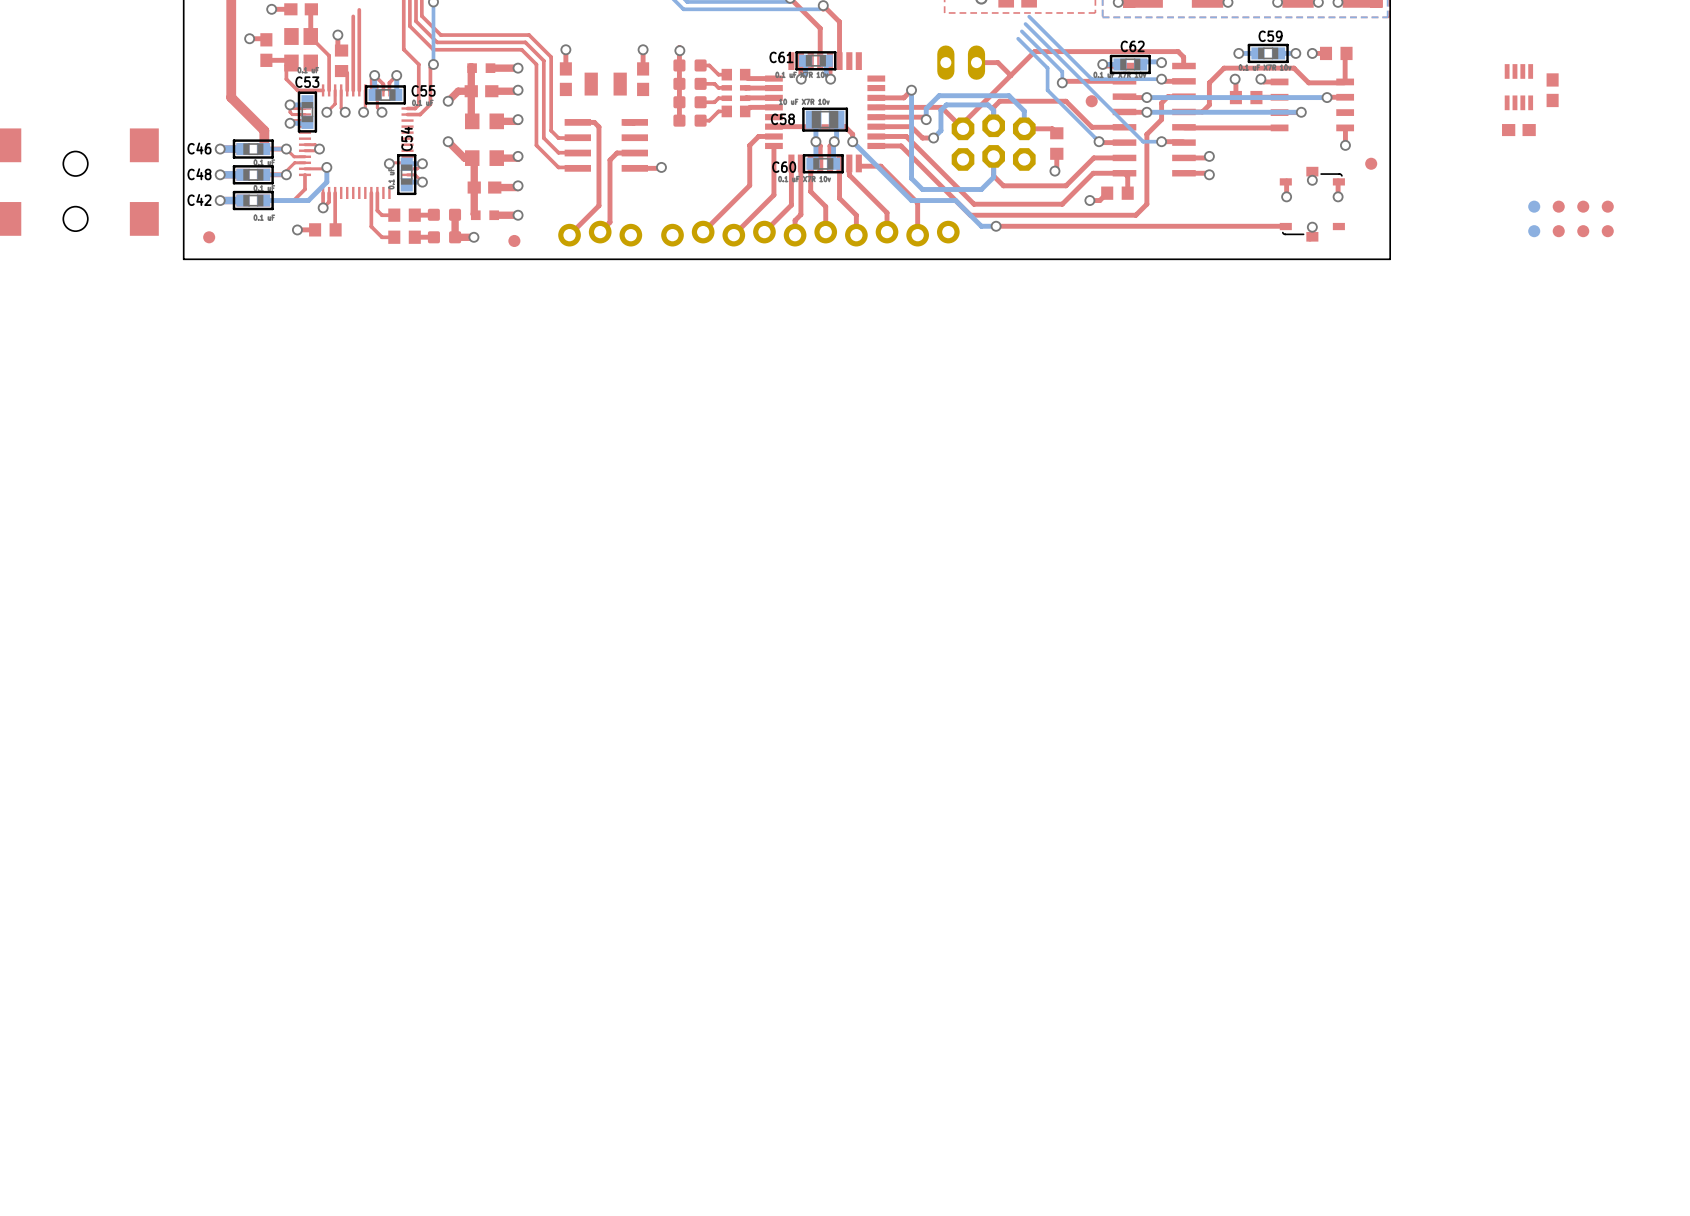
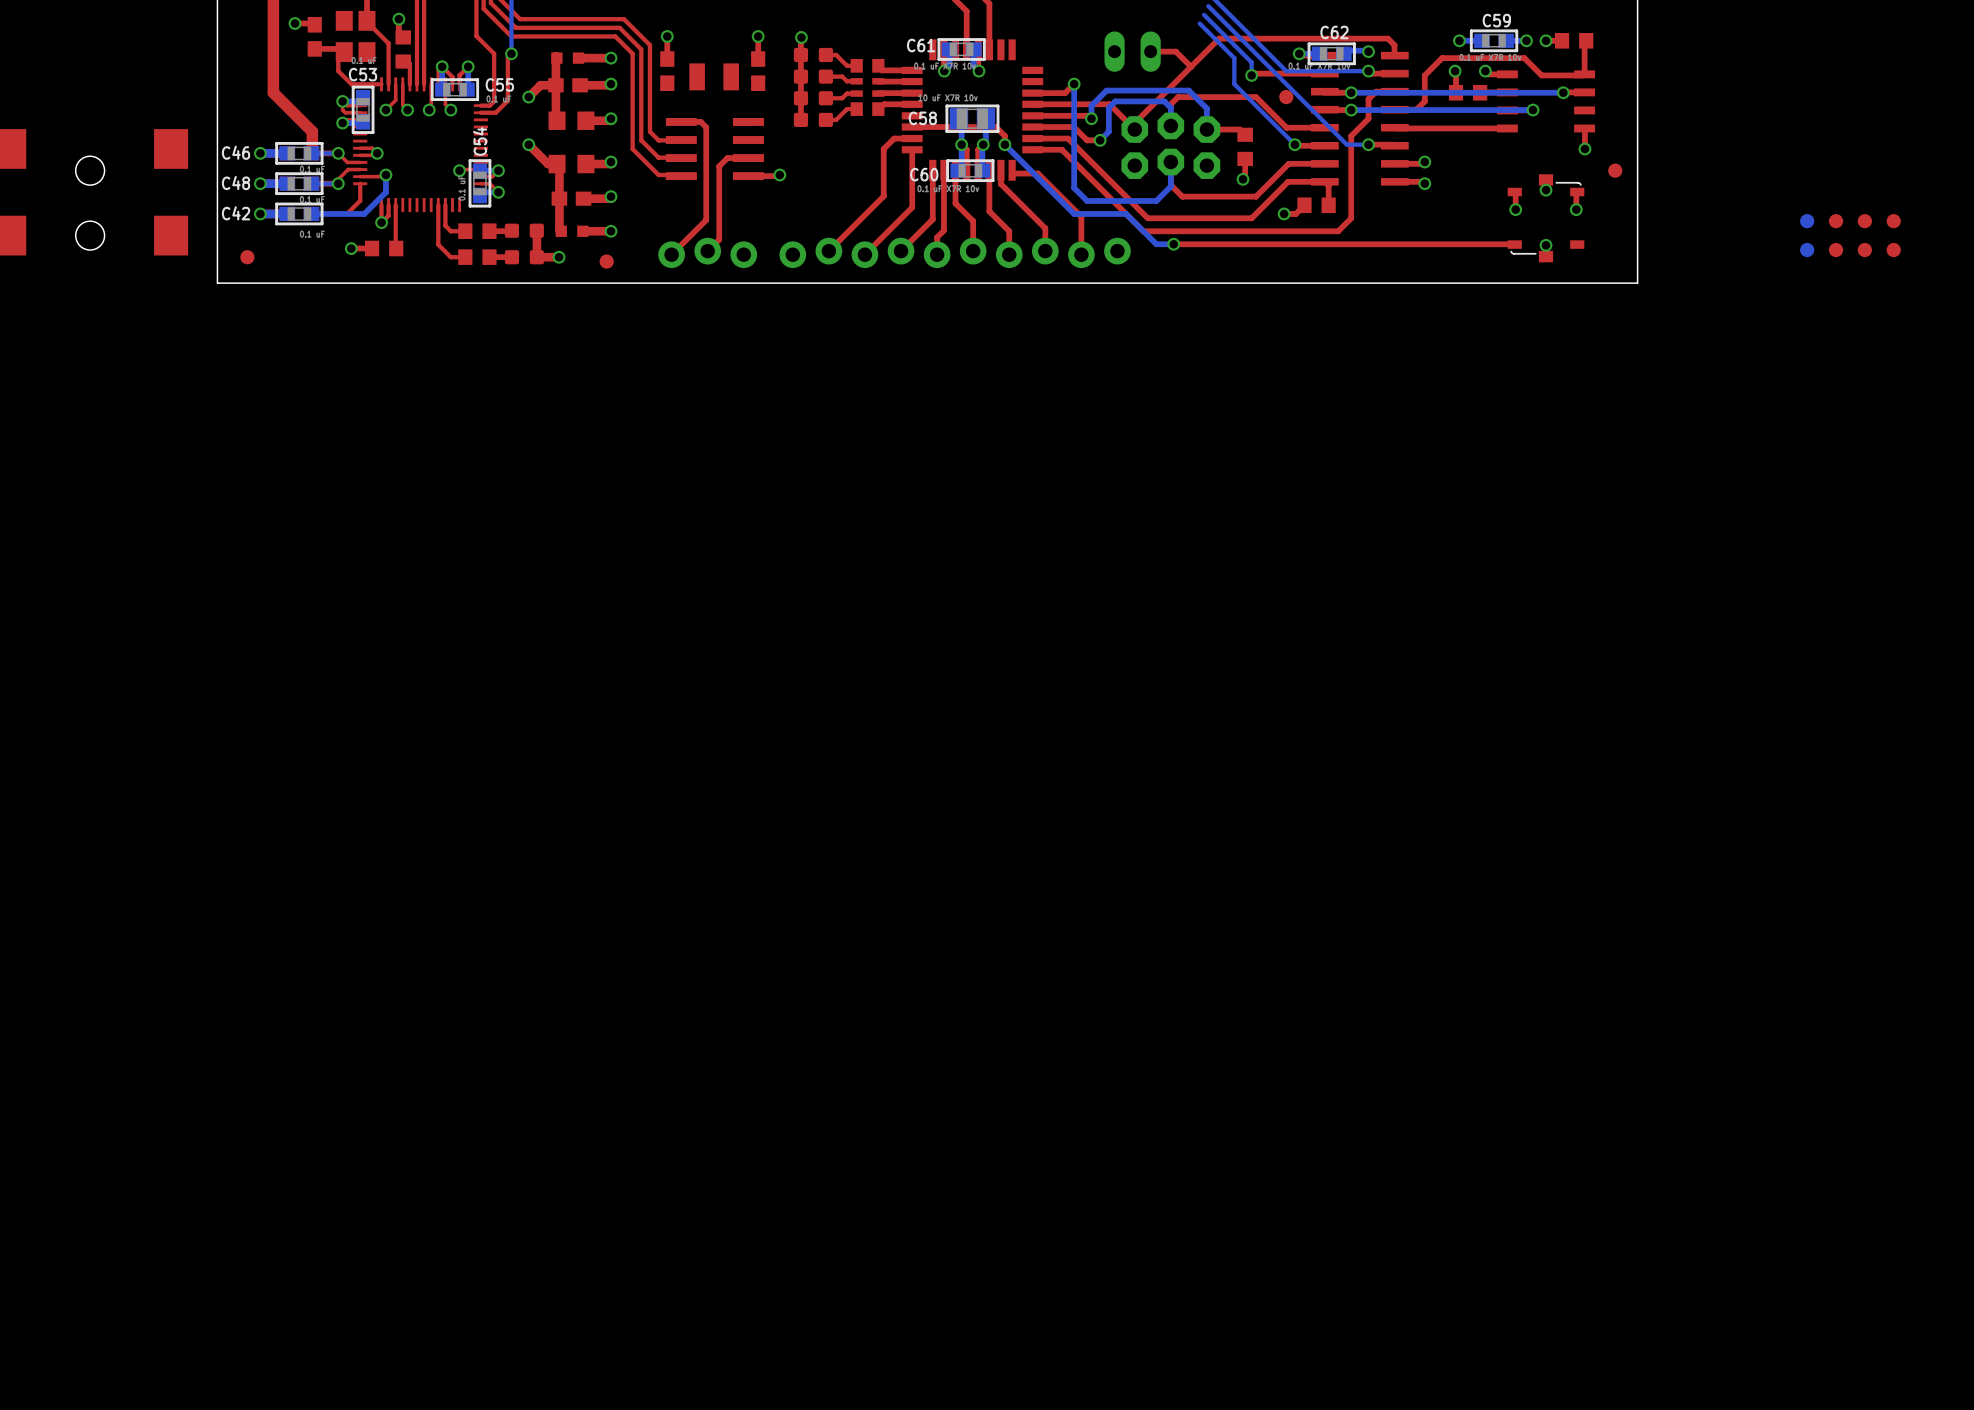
part: (1518, 87) -> none
part: (1552, 90) -> none
part: (1518, 130) -> none

